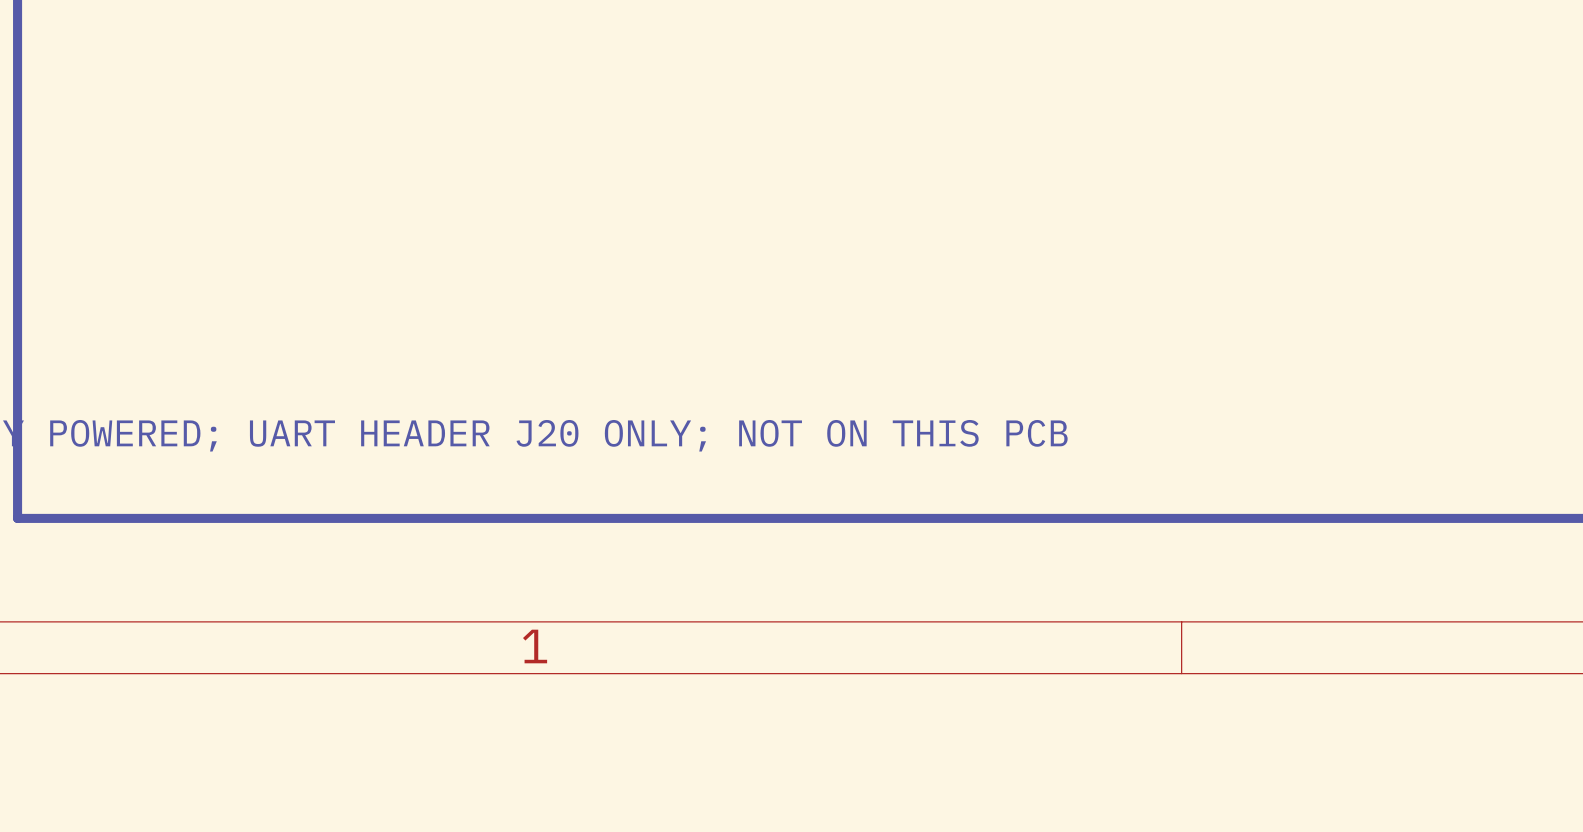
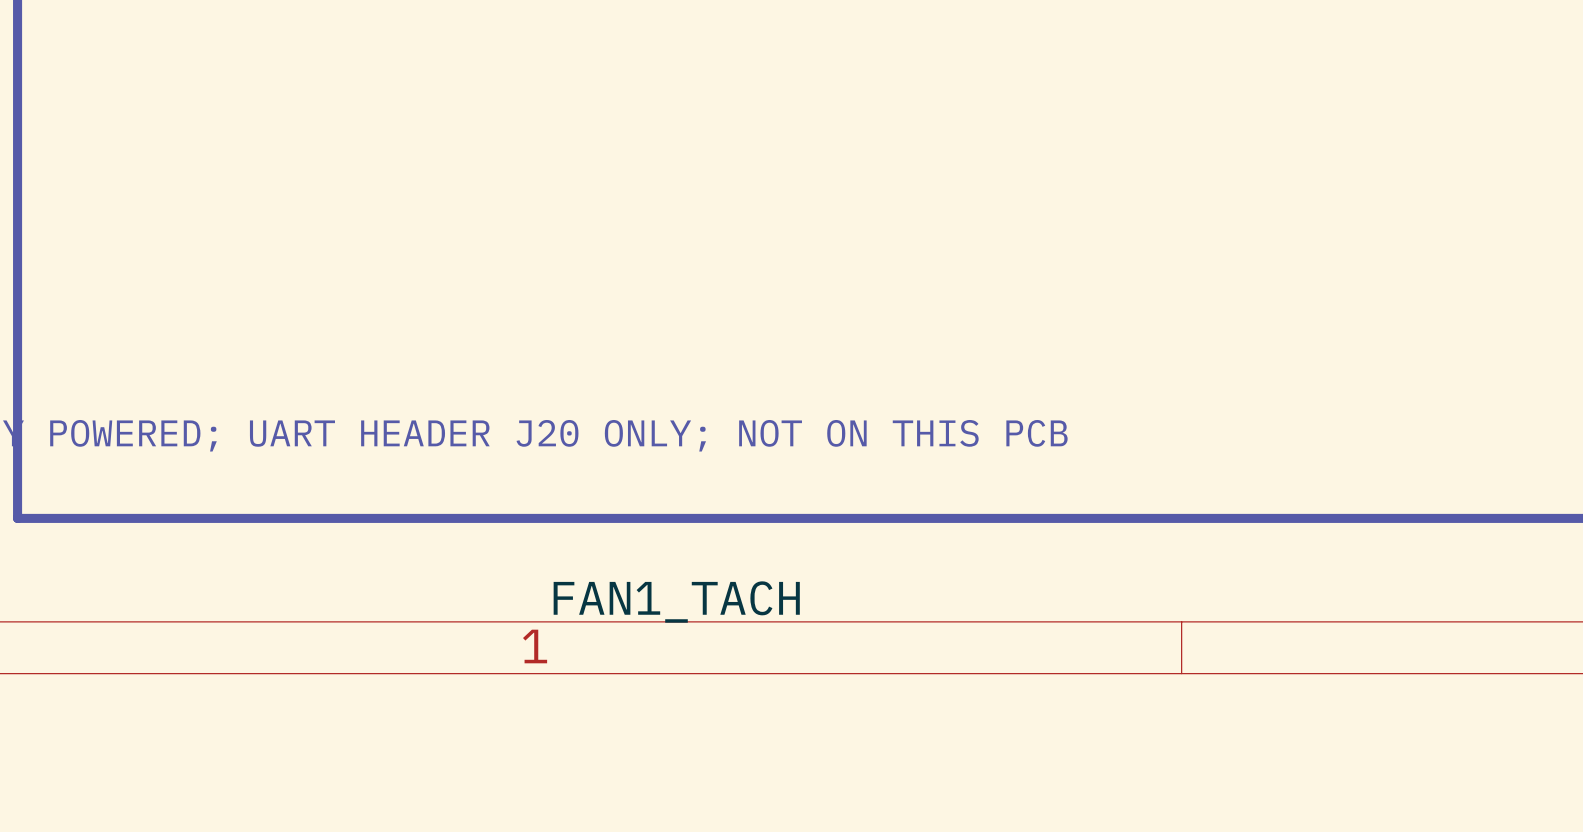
label: none -> FAN1_TACH (676, 602)

